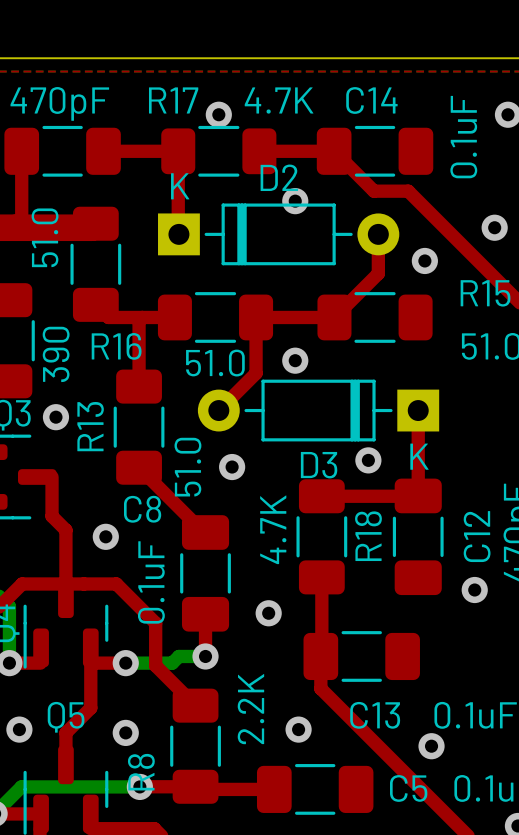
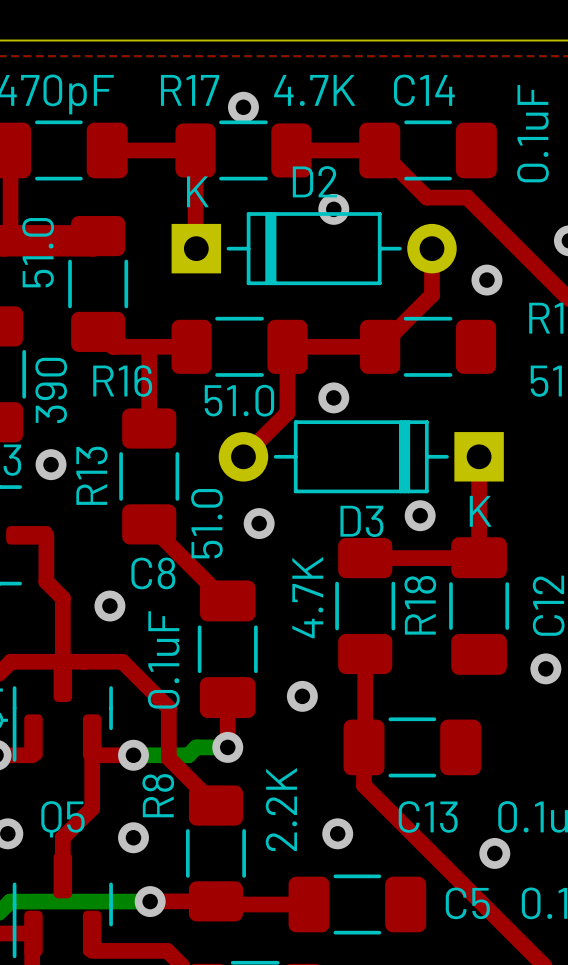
R8 name position: R8 (141, 772) -> R8 (158, 795)

